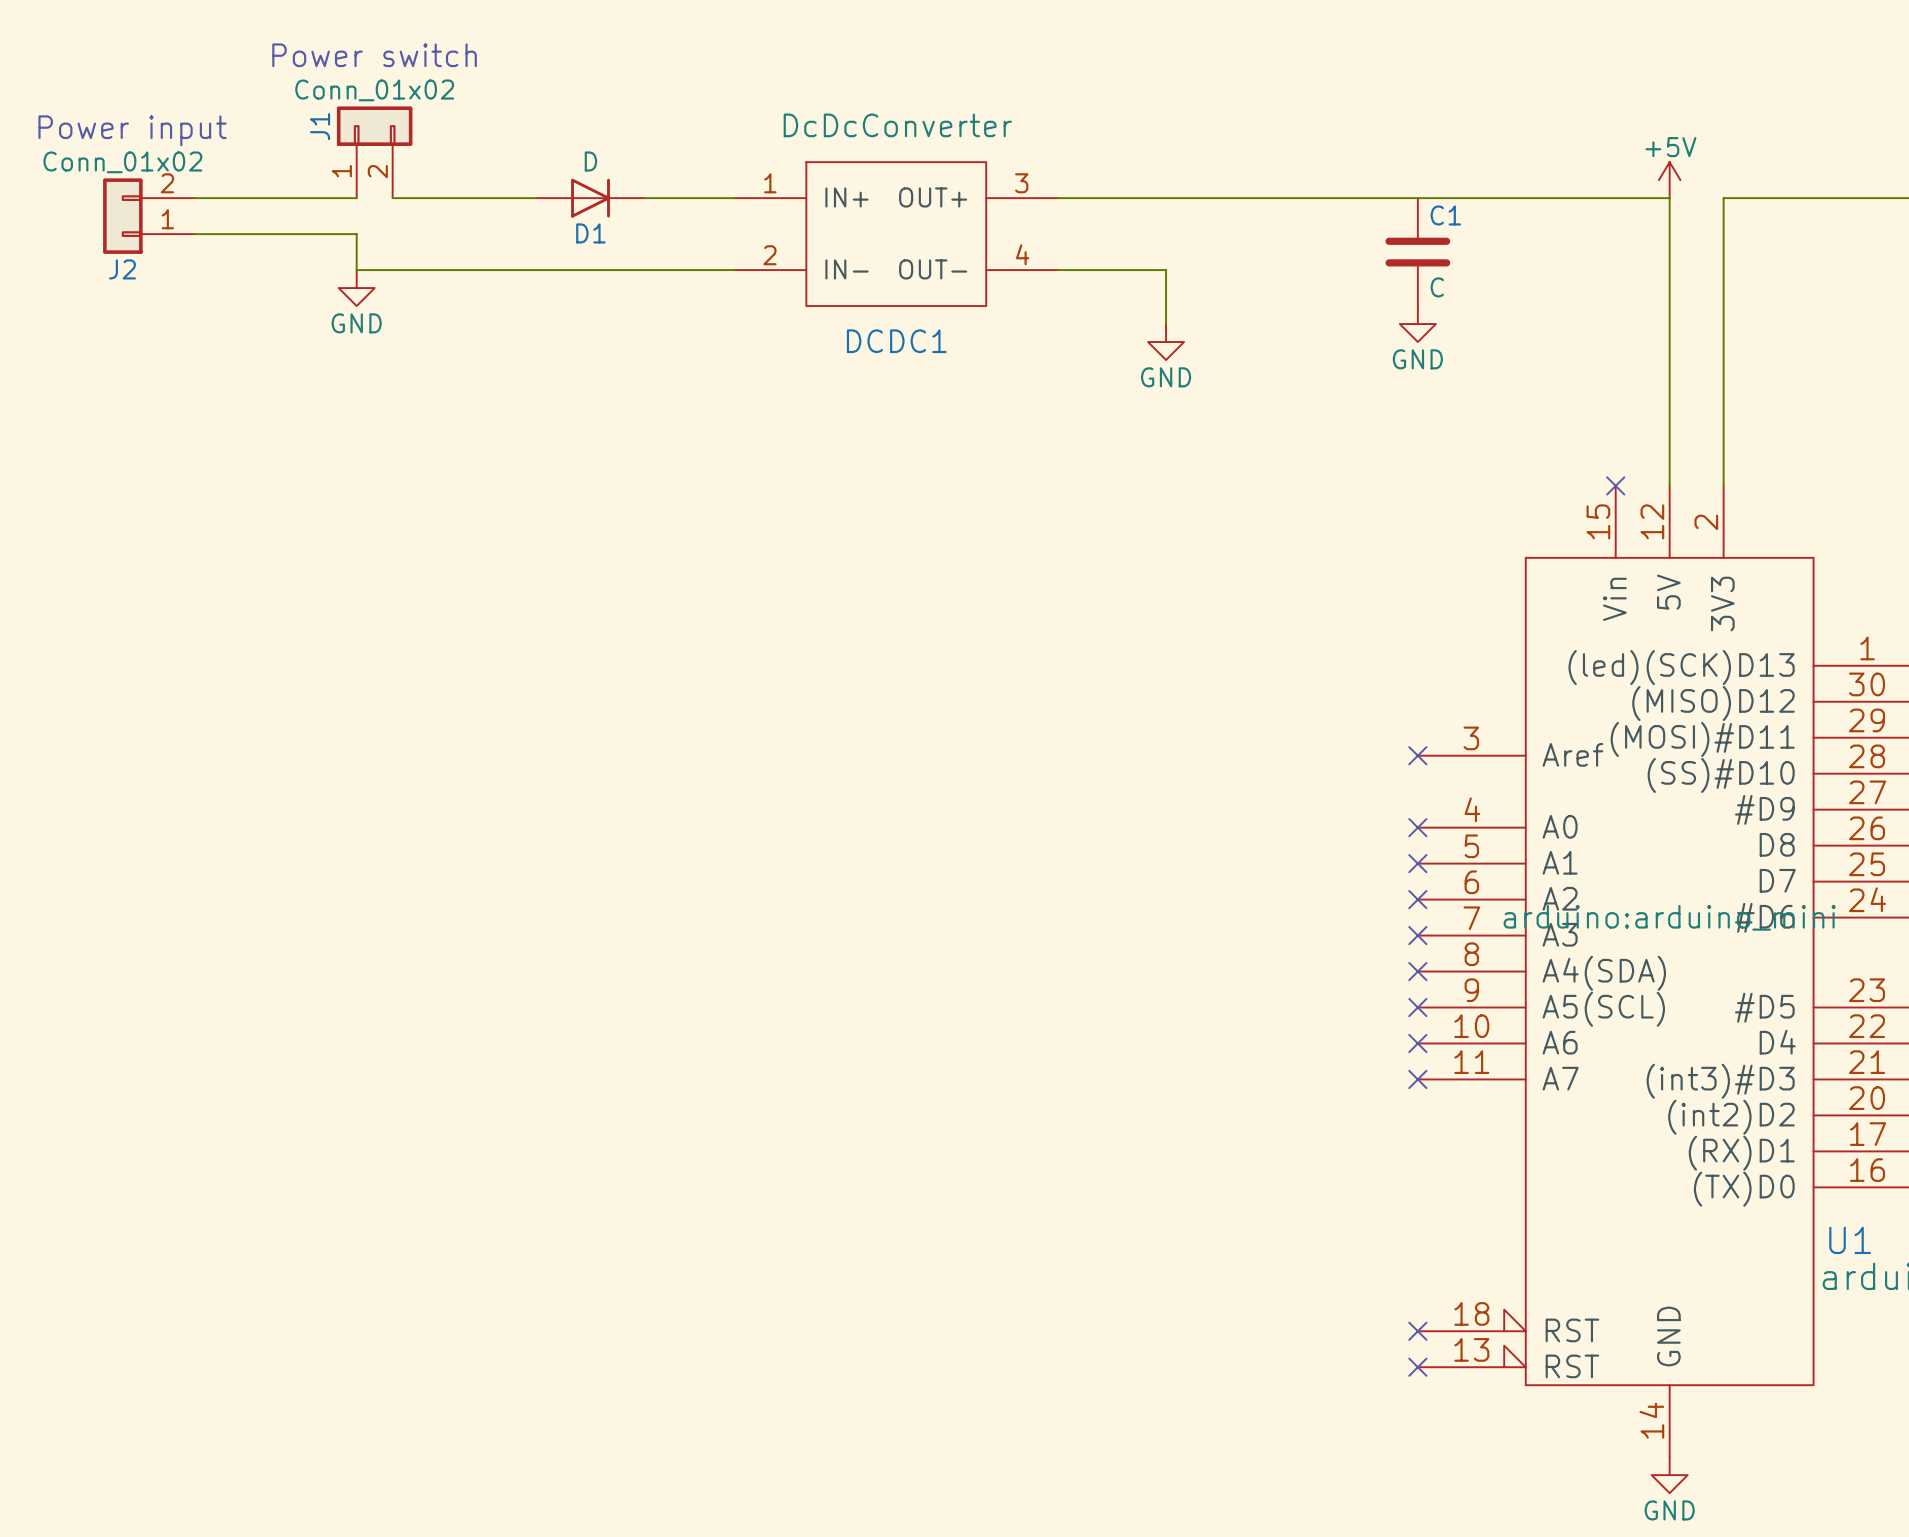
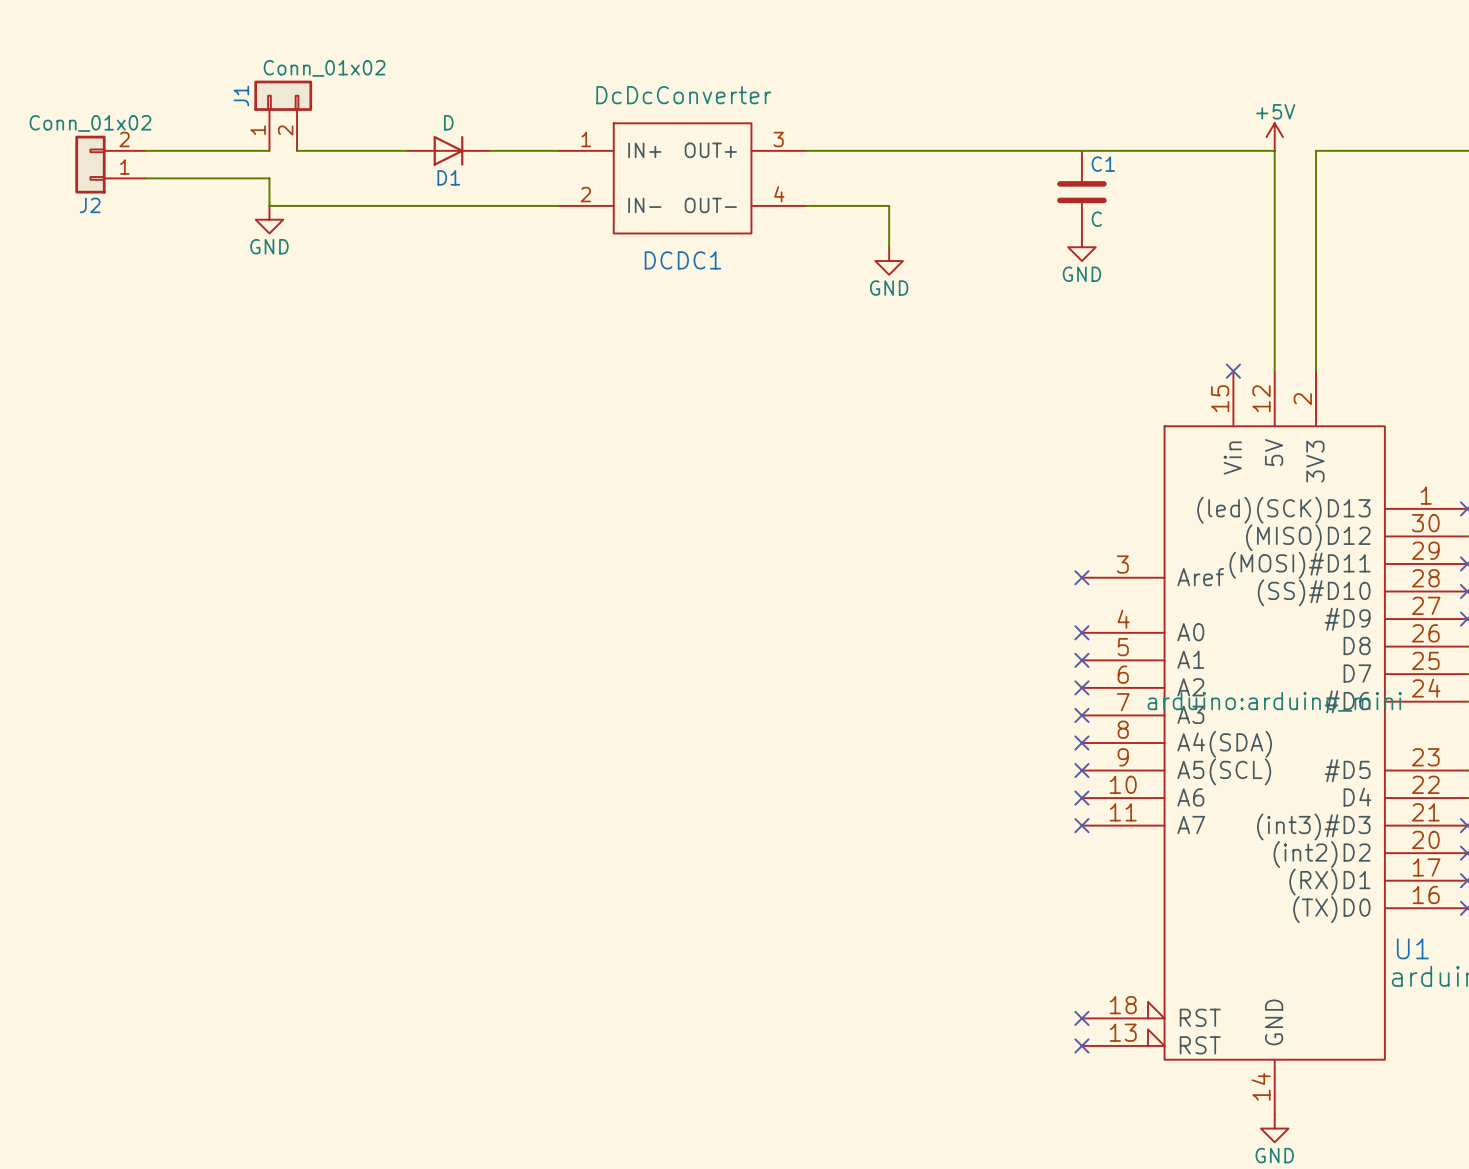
text: Power switch (374, 55) -> none
J1 value position: Conn_01x02 (374, 90) -> Conn_01x02 (324, 68)
text: Power input (132, 130) -> none

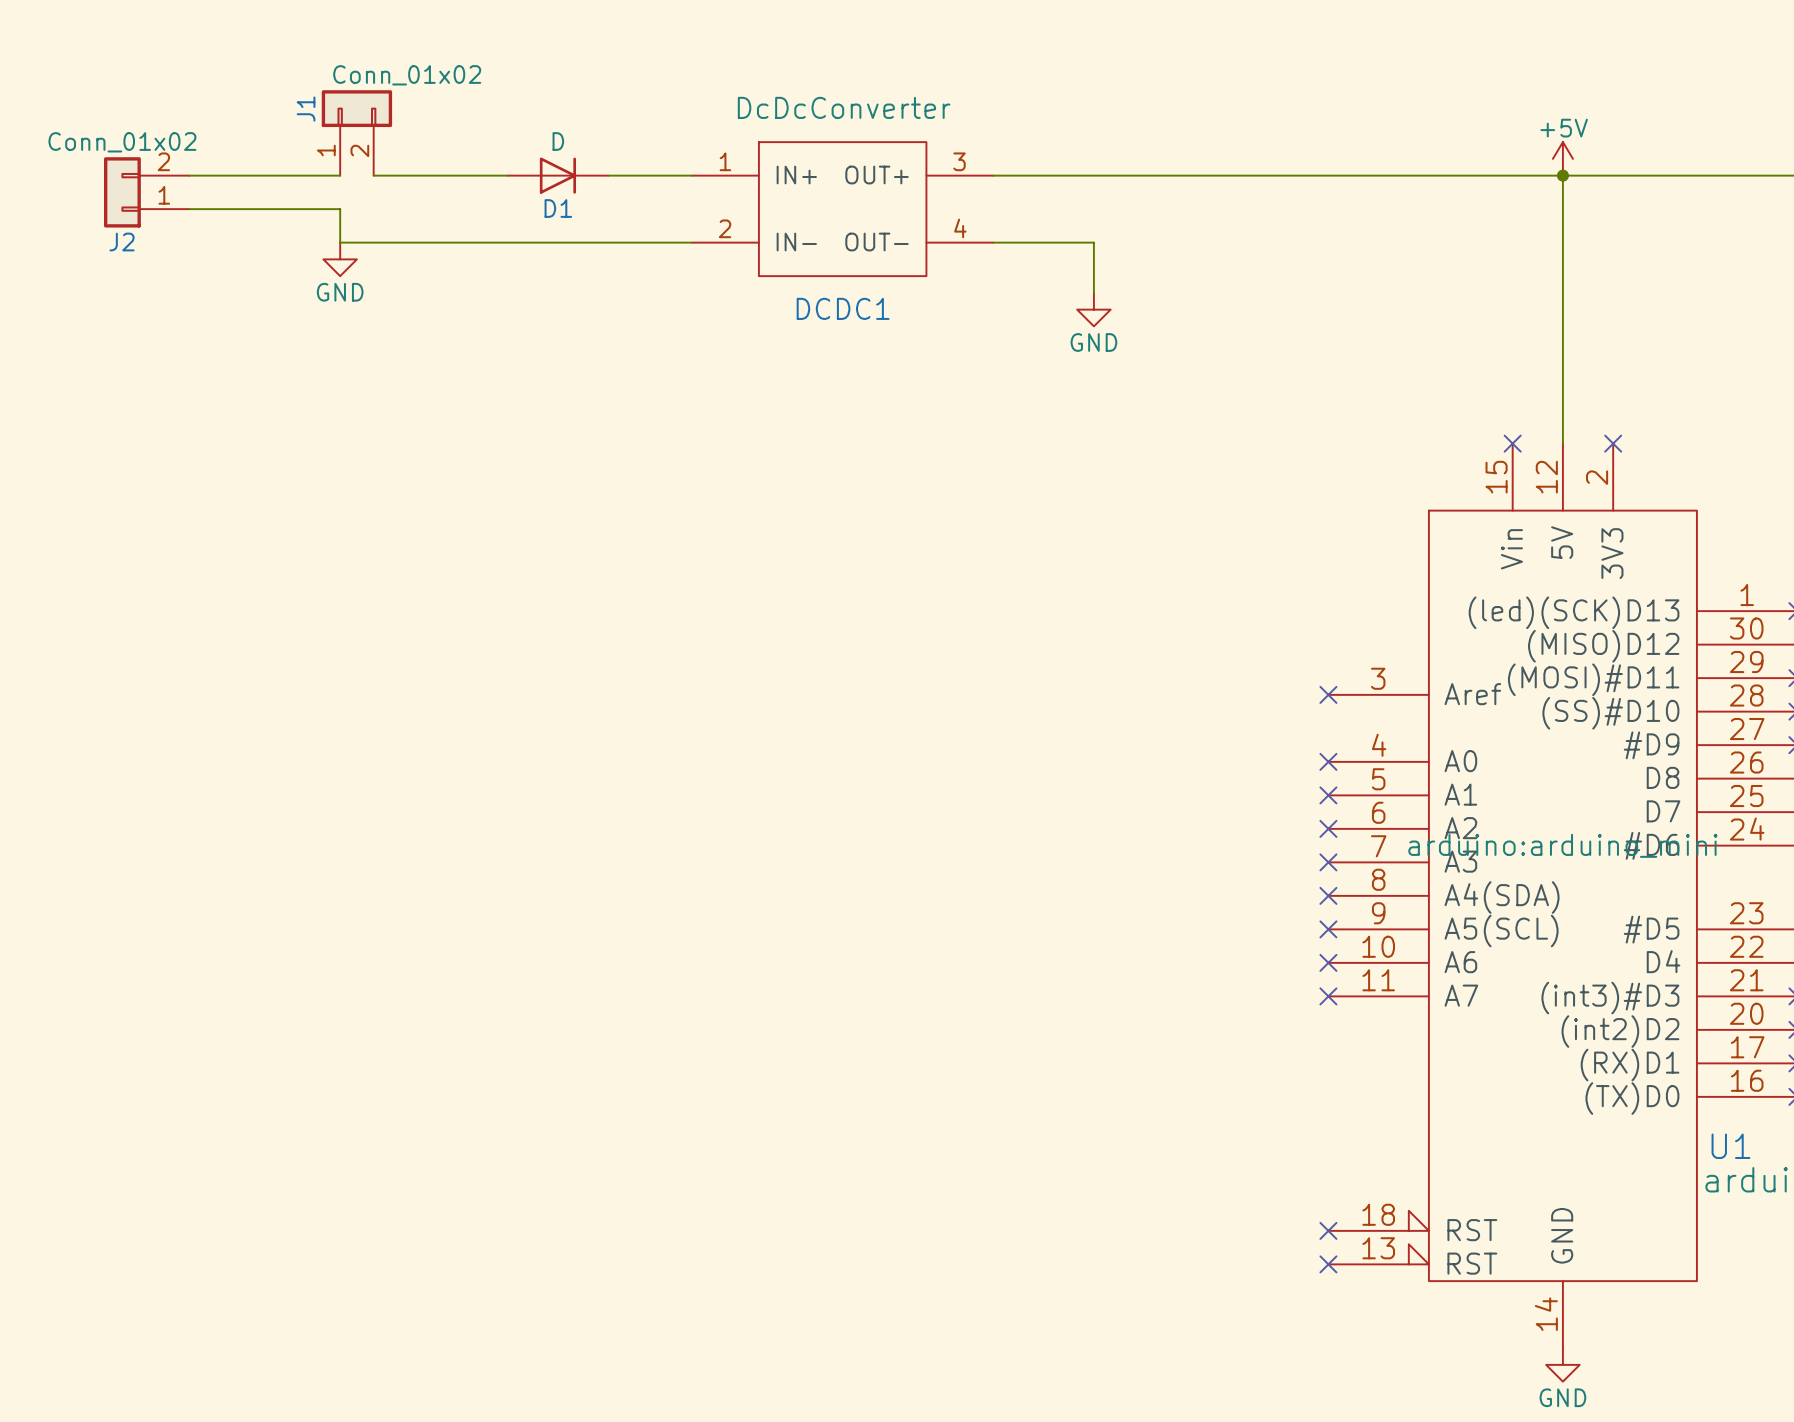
junction: none -> (1562, 175)
wire: (1316, 150) (1316, 371) -> (1613, 175) (1562, 175)
C1: C (1081, 192) -> none
power symbol: GND (1081, 247) -> none
no-connect mark: none -> (1613, 443)

